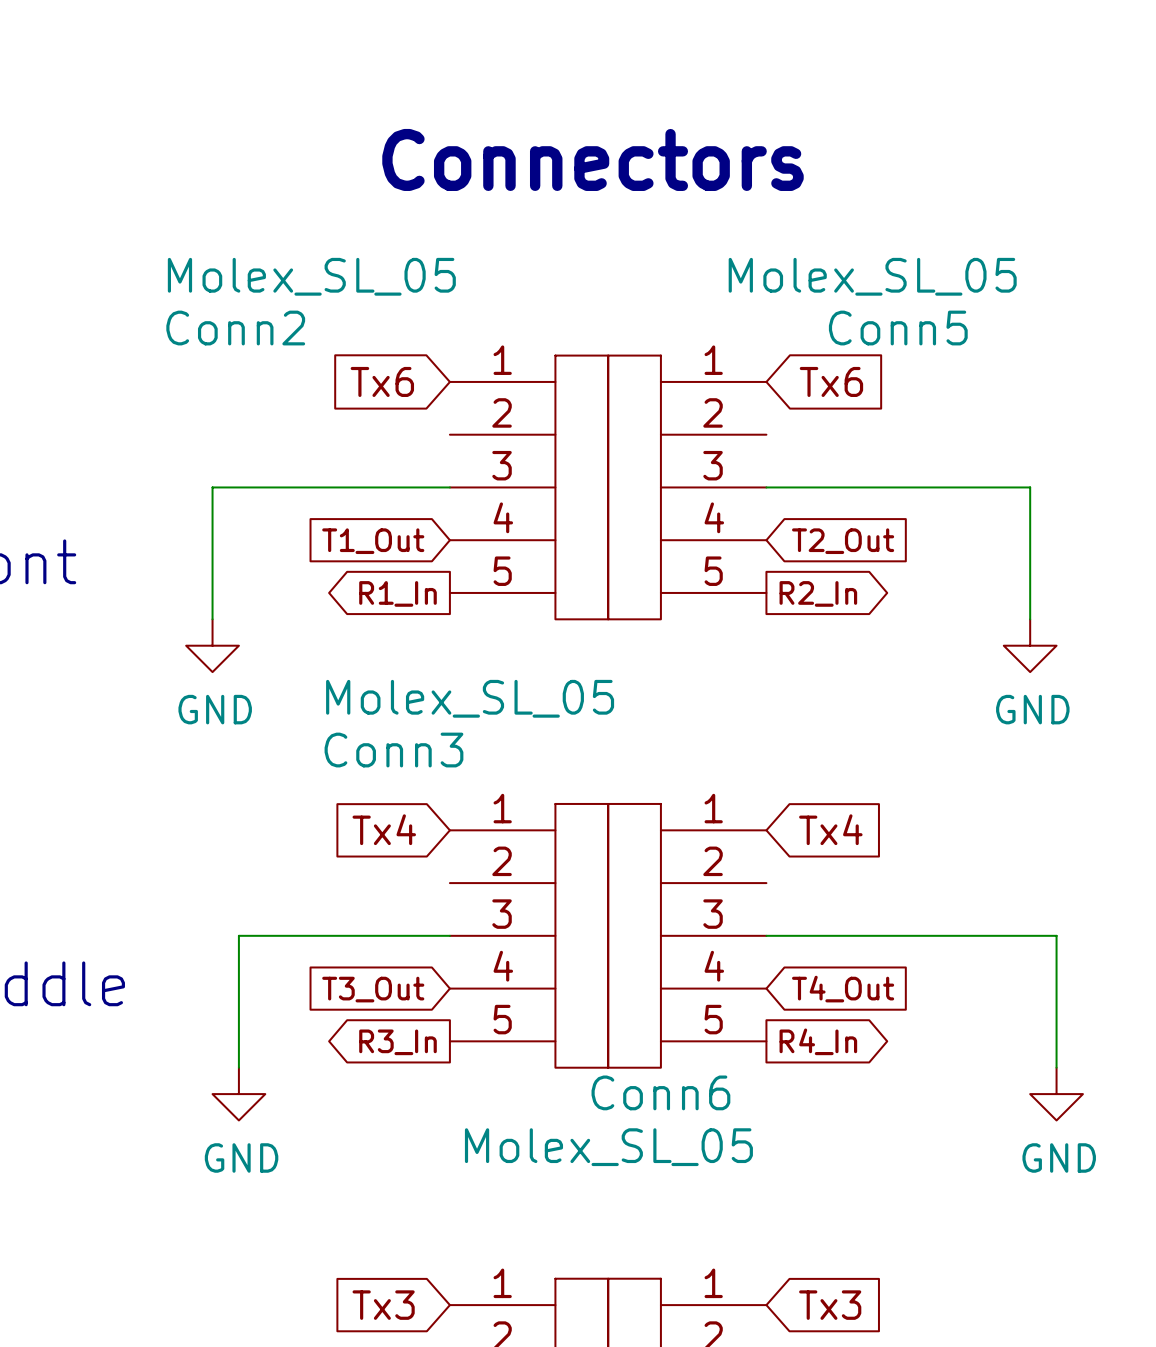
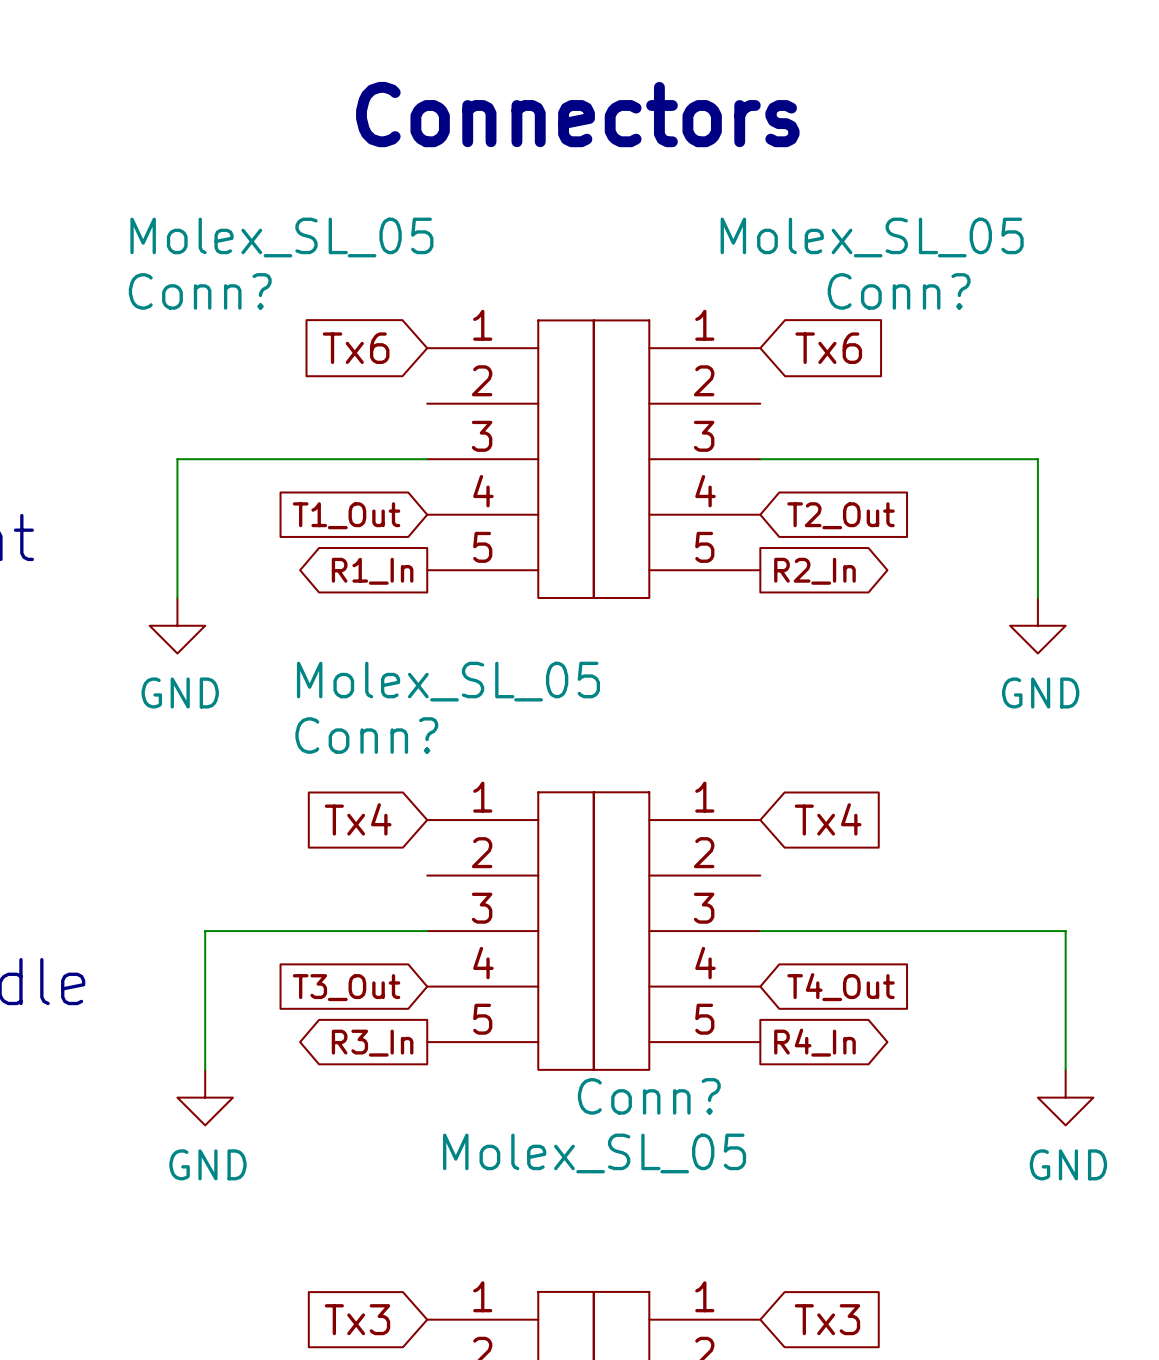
Conn2 name: Conn2 (235, 328) -> Conn? (200, 291)
Conn5 name: Conn5 (898, 328) -> Conn? (899, 291)
Conn3 name: Conn3 (393, 750) -> Conn? (366, 735)
Conn6 name: Conn6 (660, 1092) -> Conn? (649, 1096)

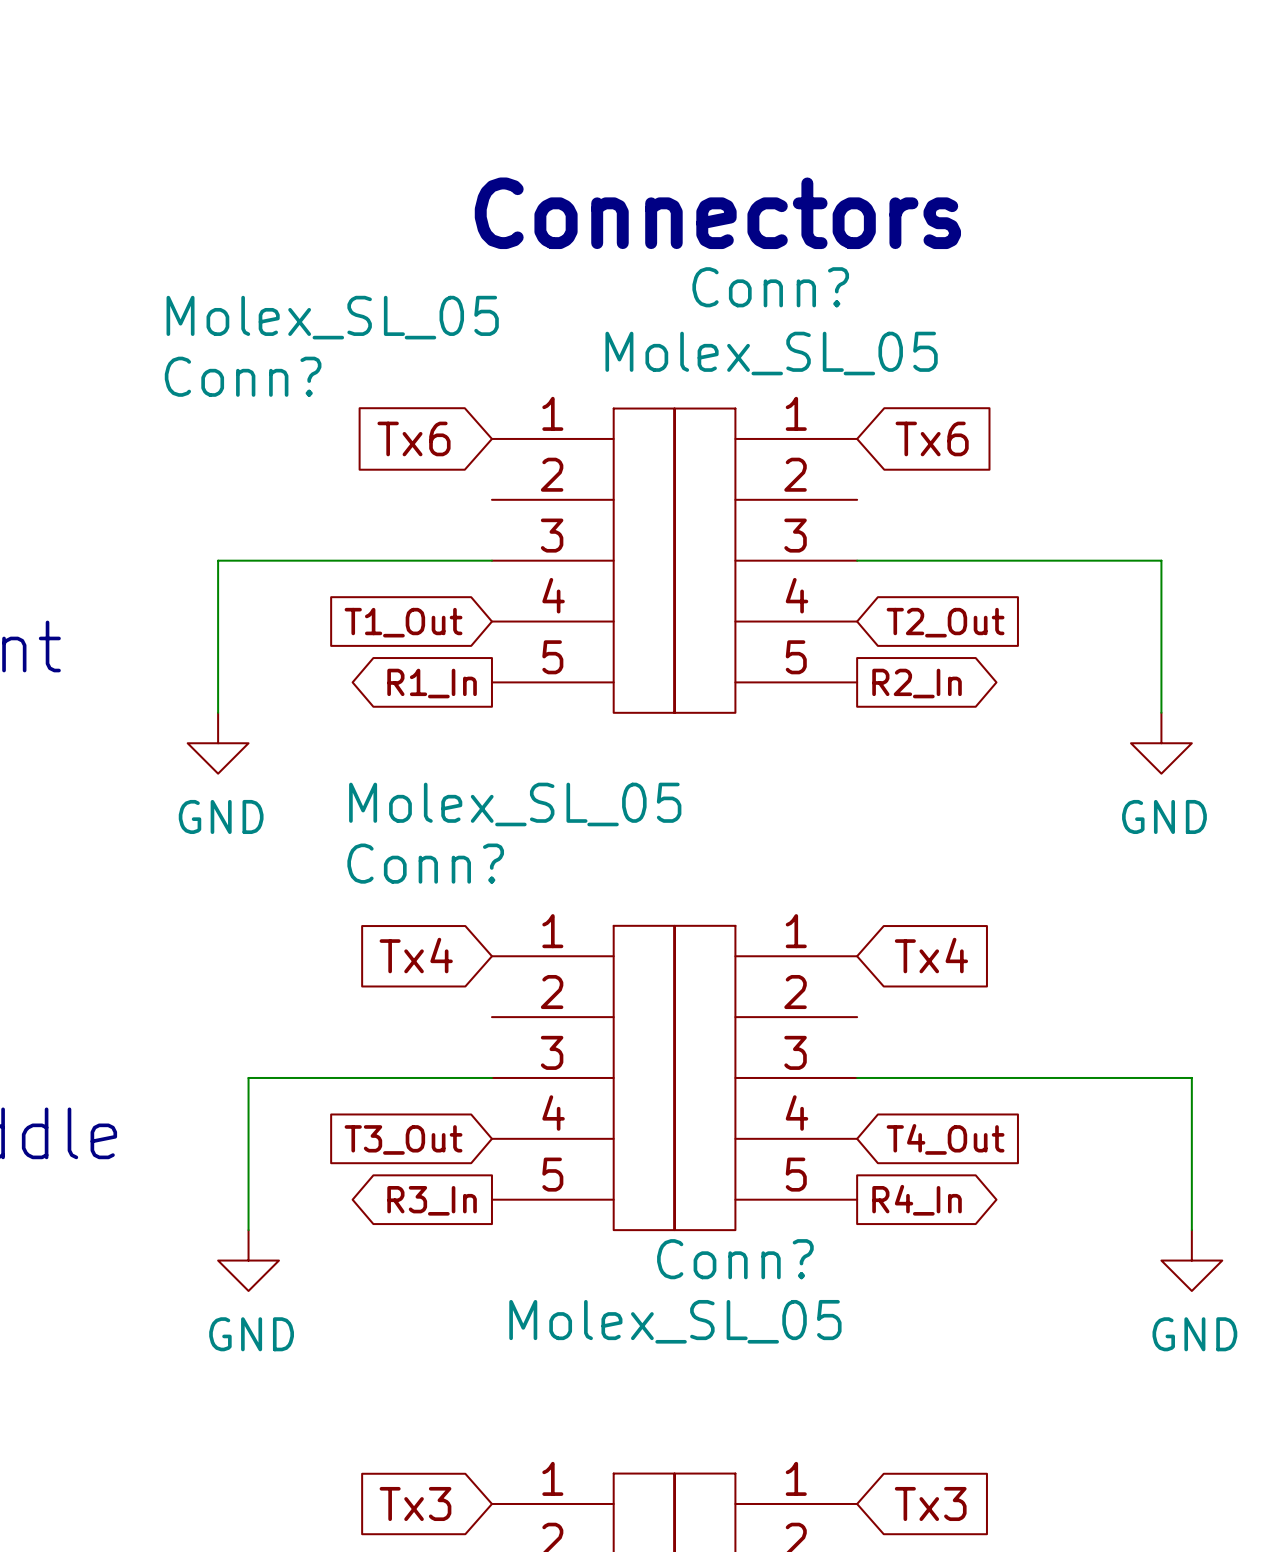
text position: Connectors (577, 114) -> Connectors (717, 213)
Conn? value position: Molex_SL_05 (872, 237) -> Molex_SL_05 (771, 353)
Conn? name position: Conn? (899, 291) -> Conn? (770, 287)

